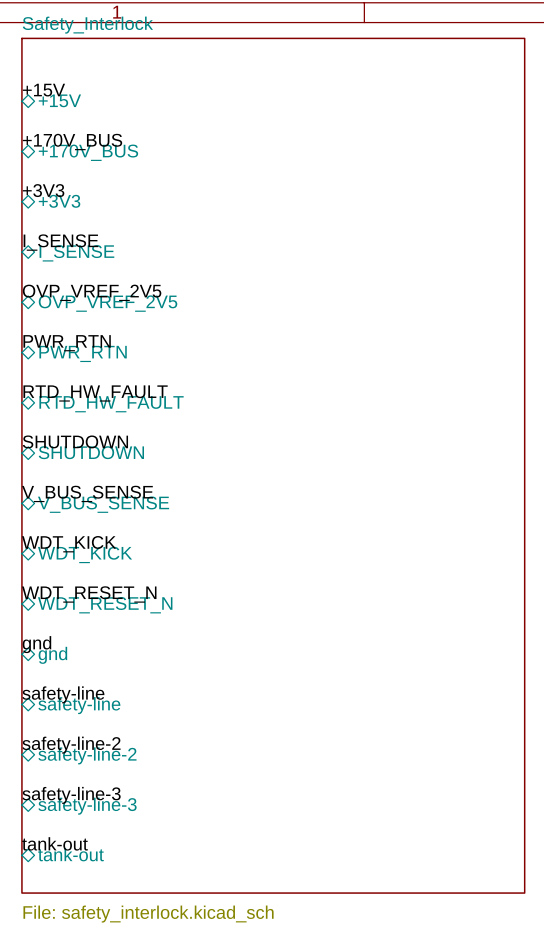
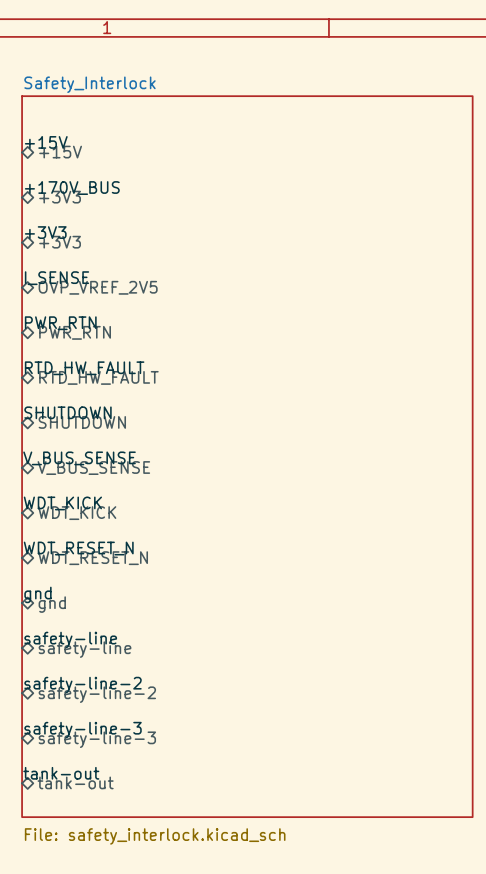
label: +15V (43, 90) -> none
sheet pin: +15V (59, 100) -> none
label: +170V_BUS (72, 142) -> +15V (46, 142)
sheet pin: +170V_BUS (88, 152) -> +15V (60, 152)
label: +3V3 (43, 190) -> +170V_BUS (72, 188)
label: I_SENSE (60, 242) -> +3V3 (45, 232)
sheet pin: I_SENSE (76, 253) -> +3V3 (60, 242)
label: OVP_VREF_2V5 (92, 292) -> I_SENSE (57, 278)
sheet Safety_Interlock: File: safety_interlock.kicad_sch (273, 465) -> none
sheet Safety_Interlock: none -> File: safety_interlock.kicad_sch (247, 456)

